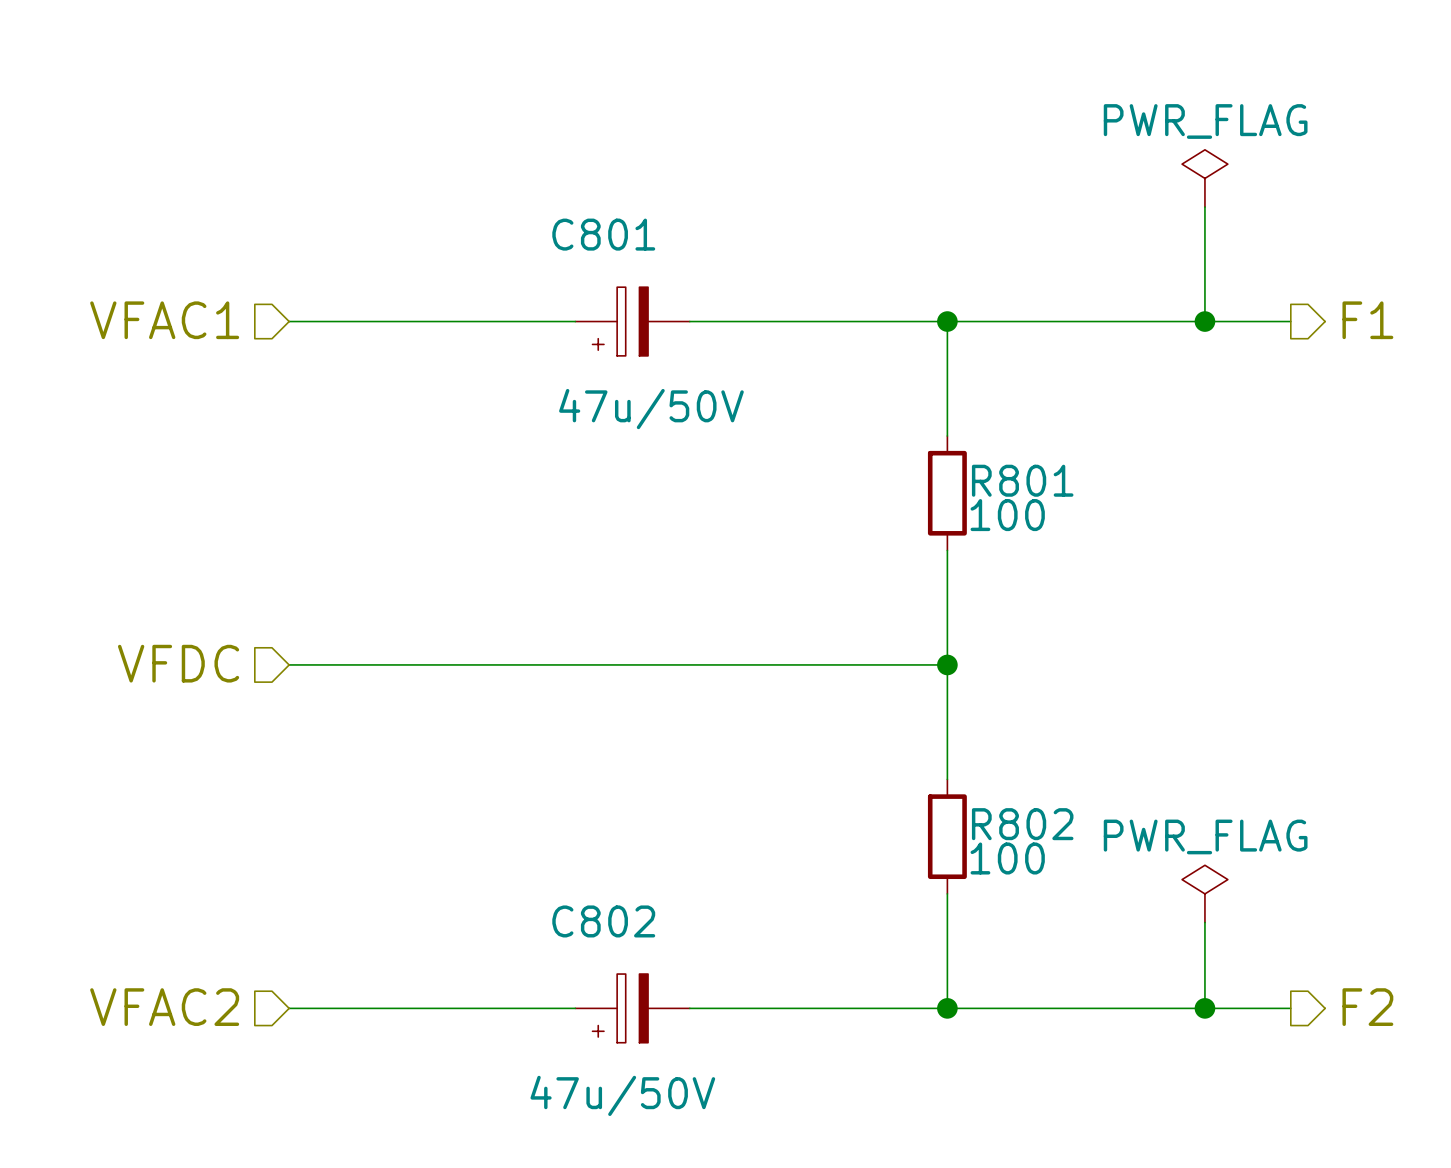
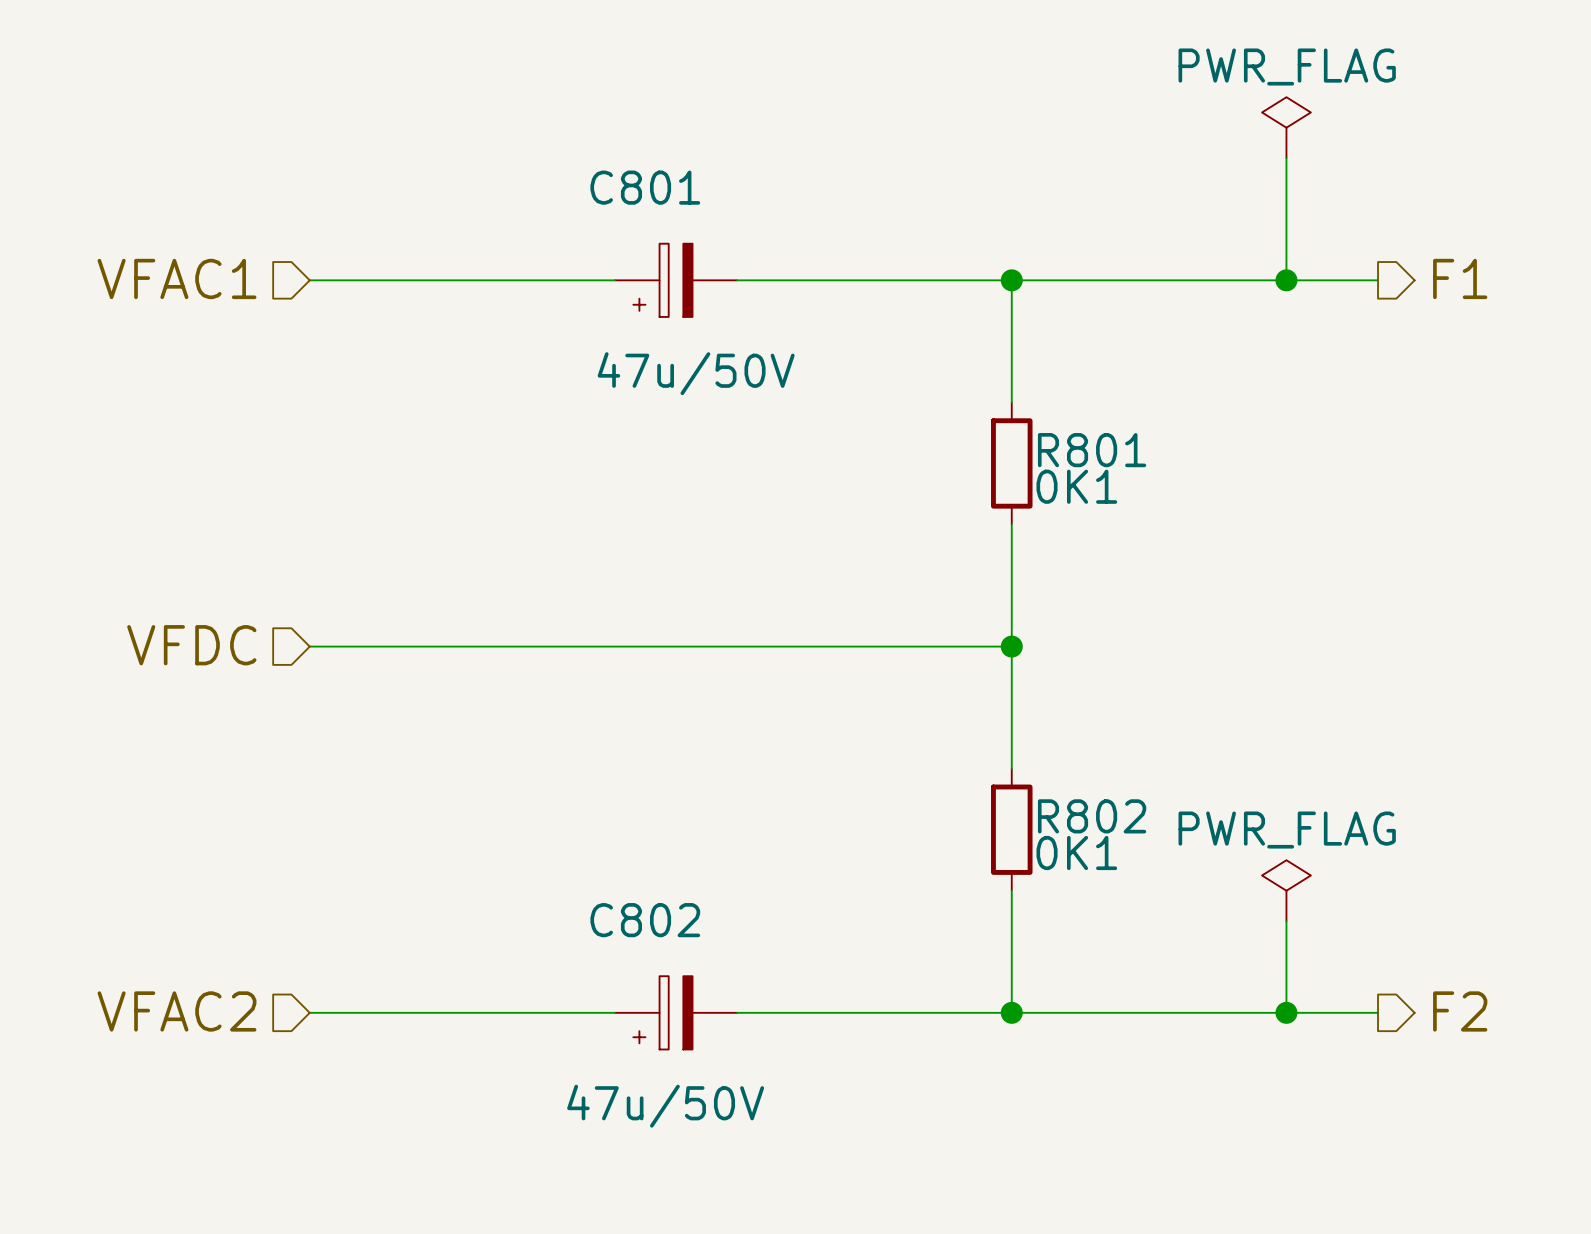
R801 value: 100 (1007, 515) -> 0K1 (1076, 486)
R802 value: 100 (1007, 858) -> 0K1 (1076, 852)

